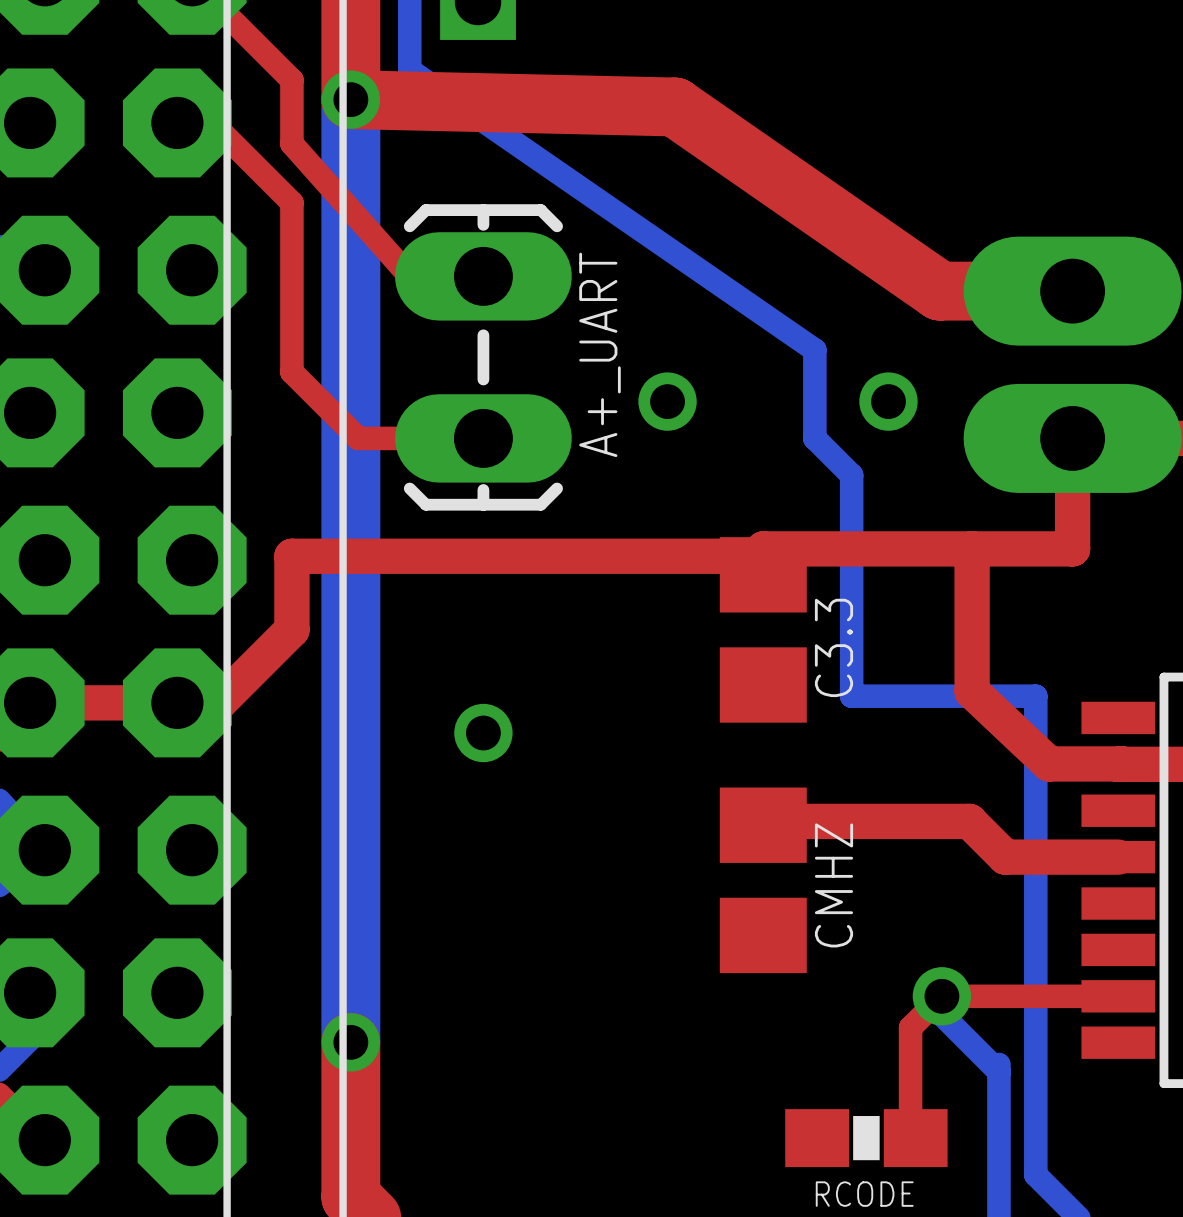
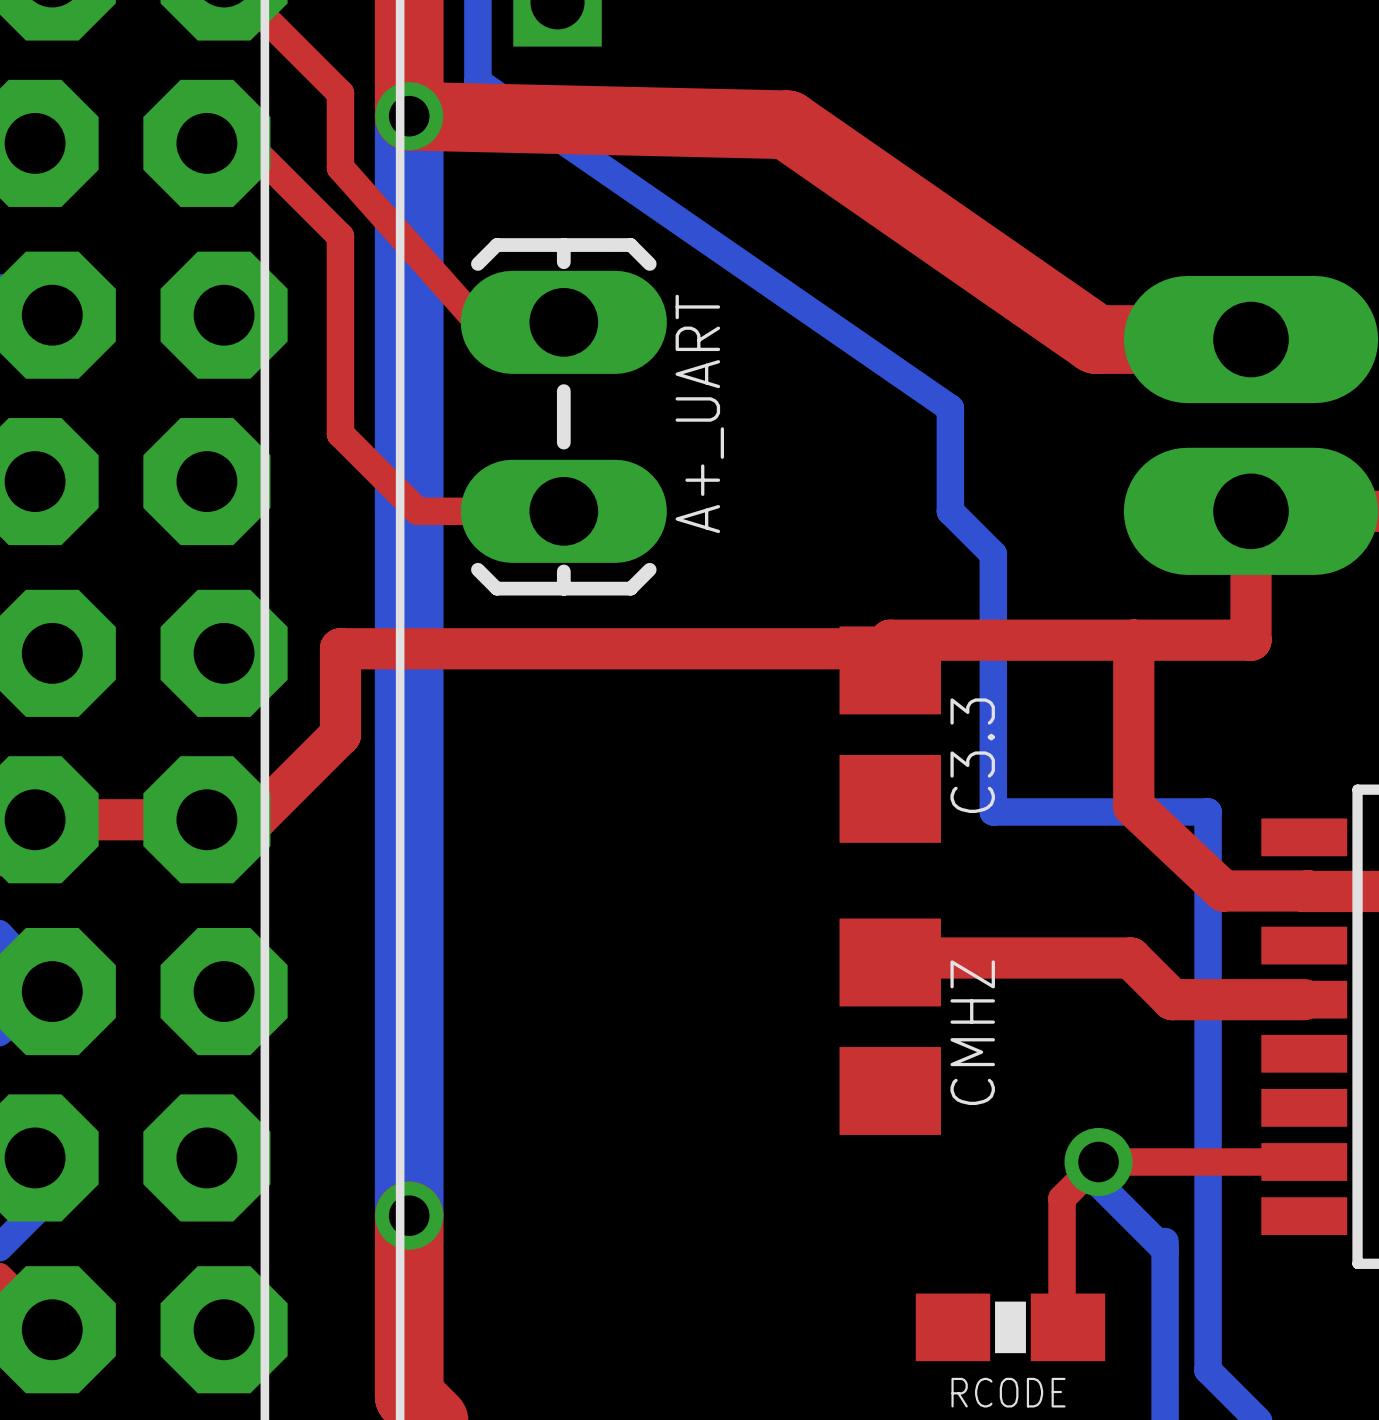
via: (667, 401) -> none
via: (888, 401) -> none
via: (483, 733) -> none

